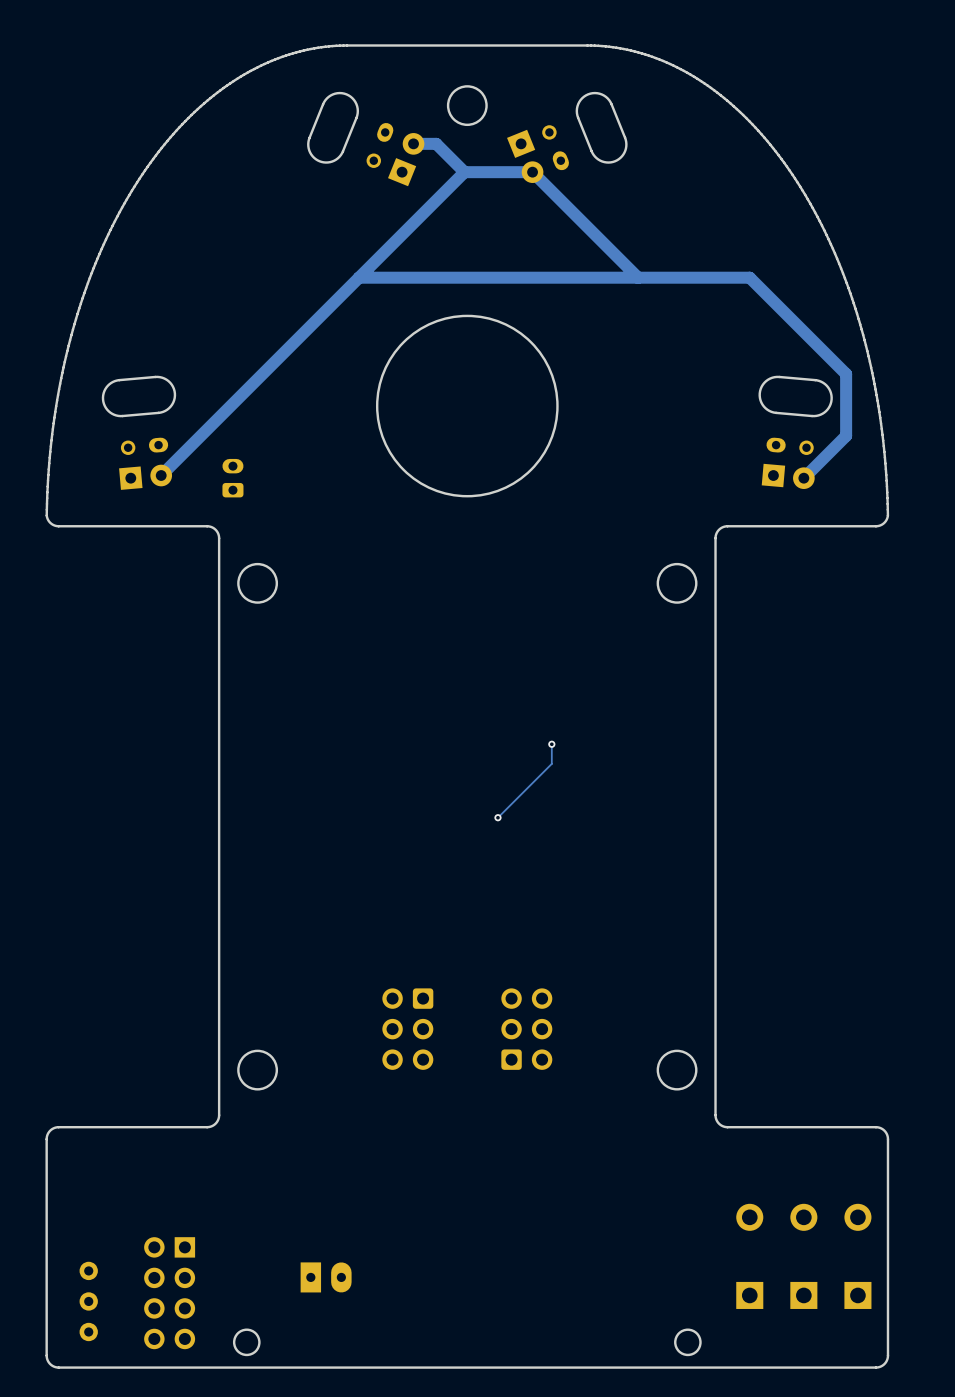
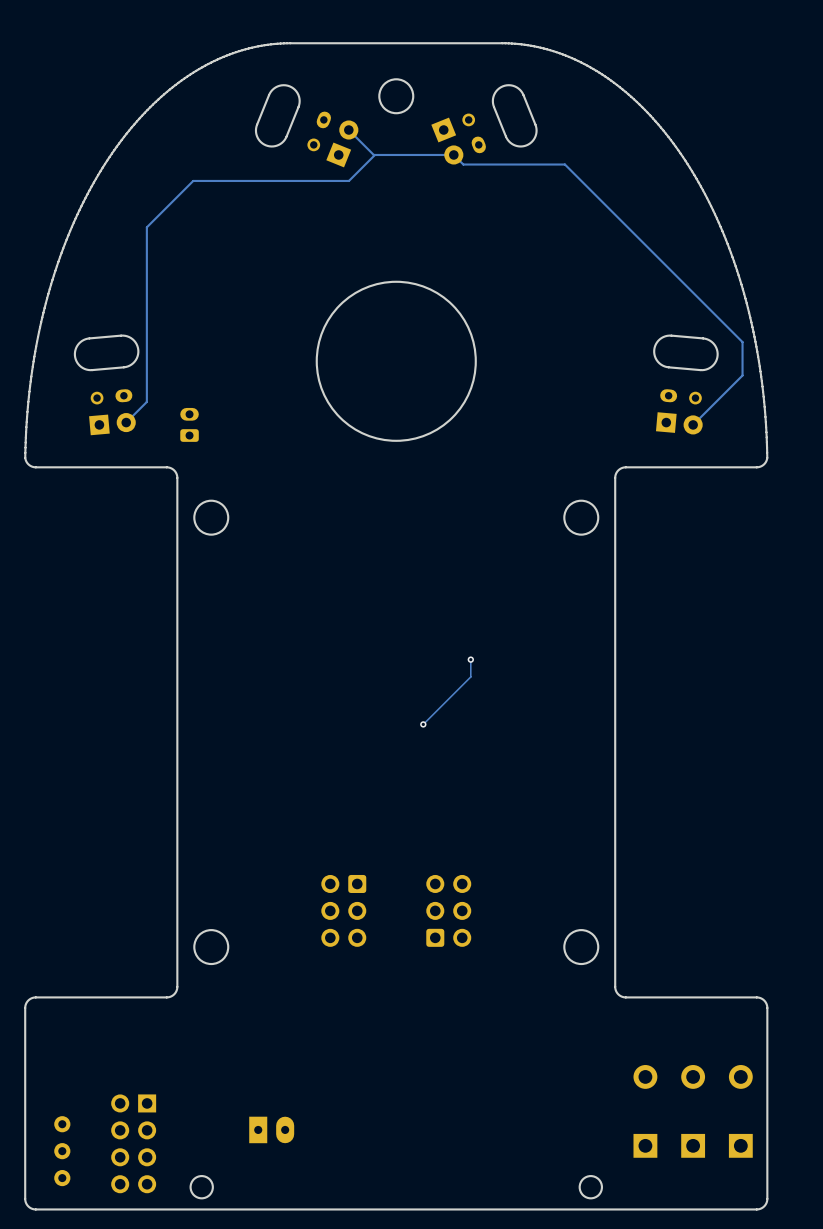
track: (413, 143) (436, 143) (464, 172) (184, 452) -> (374, 154) (348, 180) (193, 180) (146, 227) (146, 401)
track: none -> (348, 130) (373, 154) (393, 154)
track width: thick (464, 172) (532, 172) (543, 182) -> thin (393, 154) (453, 154) (463, 164)
track: (543, 182) (638, 277) -> none
track: (359, 277) (749, 277) (846, 374) (846, 435) -> (463, 164) (564, 164) (742, 342) (742, 375) (730, 387)
track width: thick (846, 435) (803, 478) -> thin (730, 387) (693, 424)
track width: thick (184, 452) (161, 475) -> thin (146, 401) (126, 422)

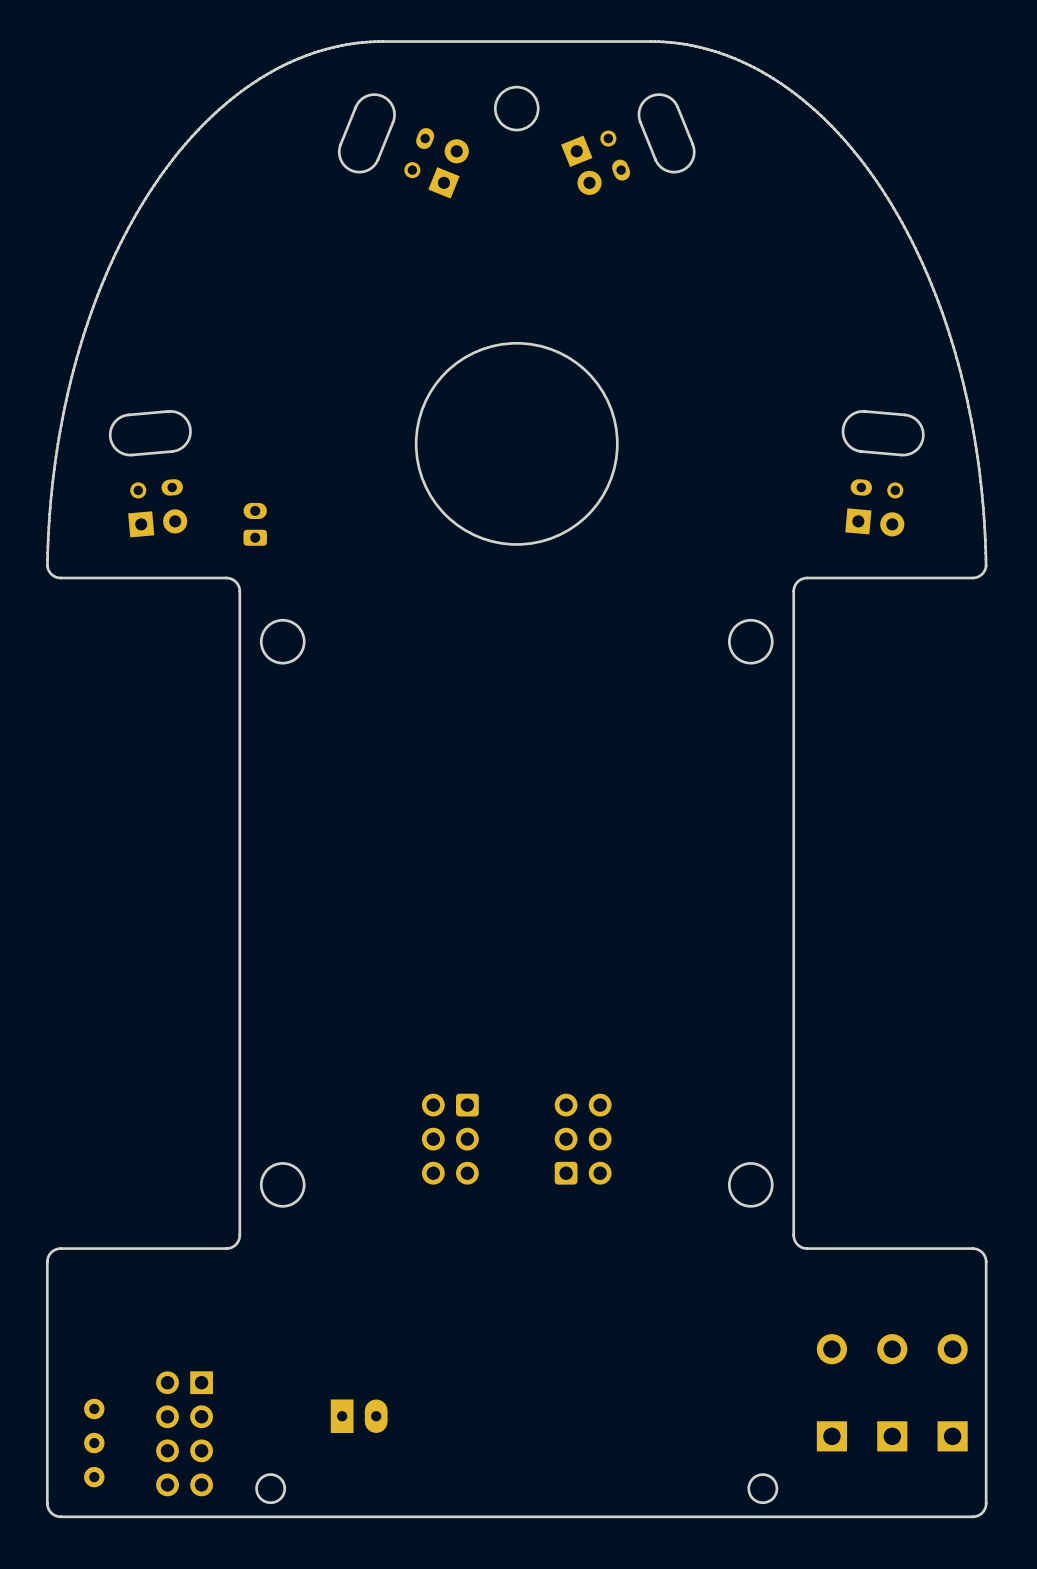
track: (348, 130) (373, 154) (453, 154) (463, 164) (564, 164) (742, 342) (742, 375) (693, 424) -> none
track: (374, 154) (348, 180) (193, 180) (146, 227) (146, 401) (126, 422) -> none
track: (470, 659) (470, 676) (423, 724) -> none
via: (470, 659) -> none
via: (423, 724) -> none

